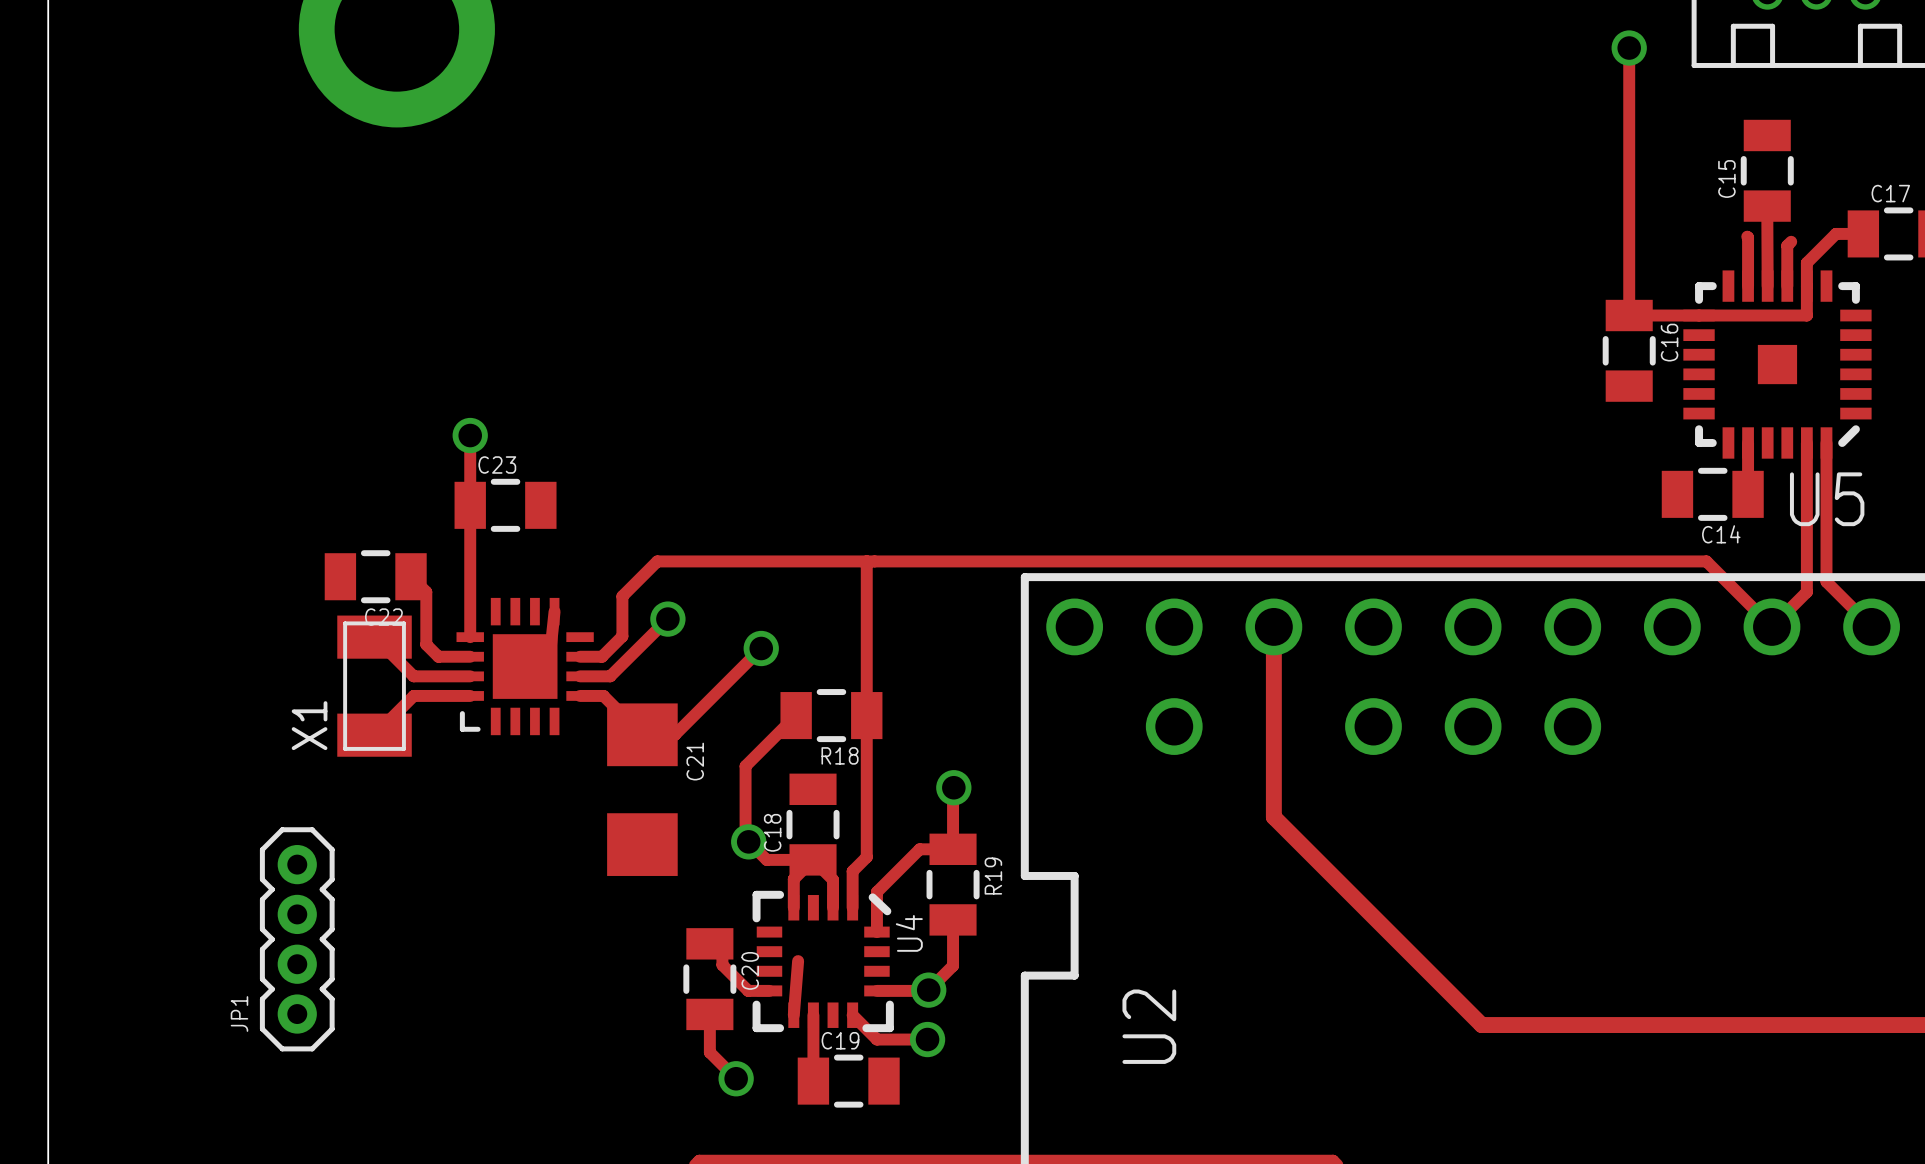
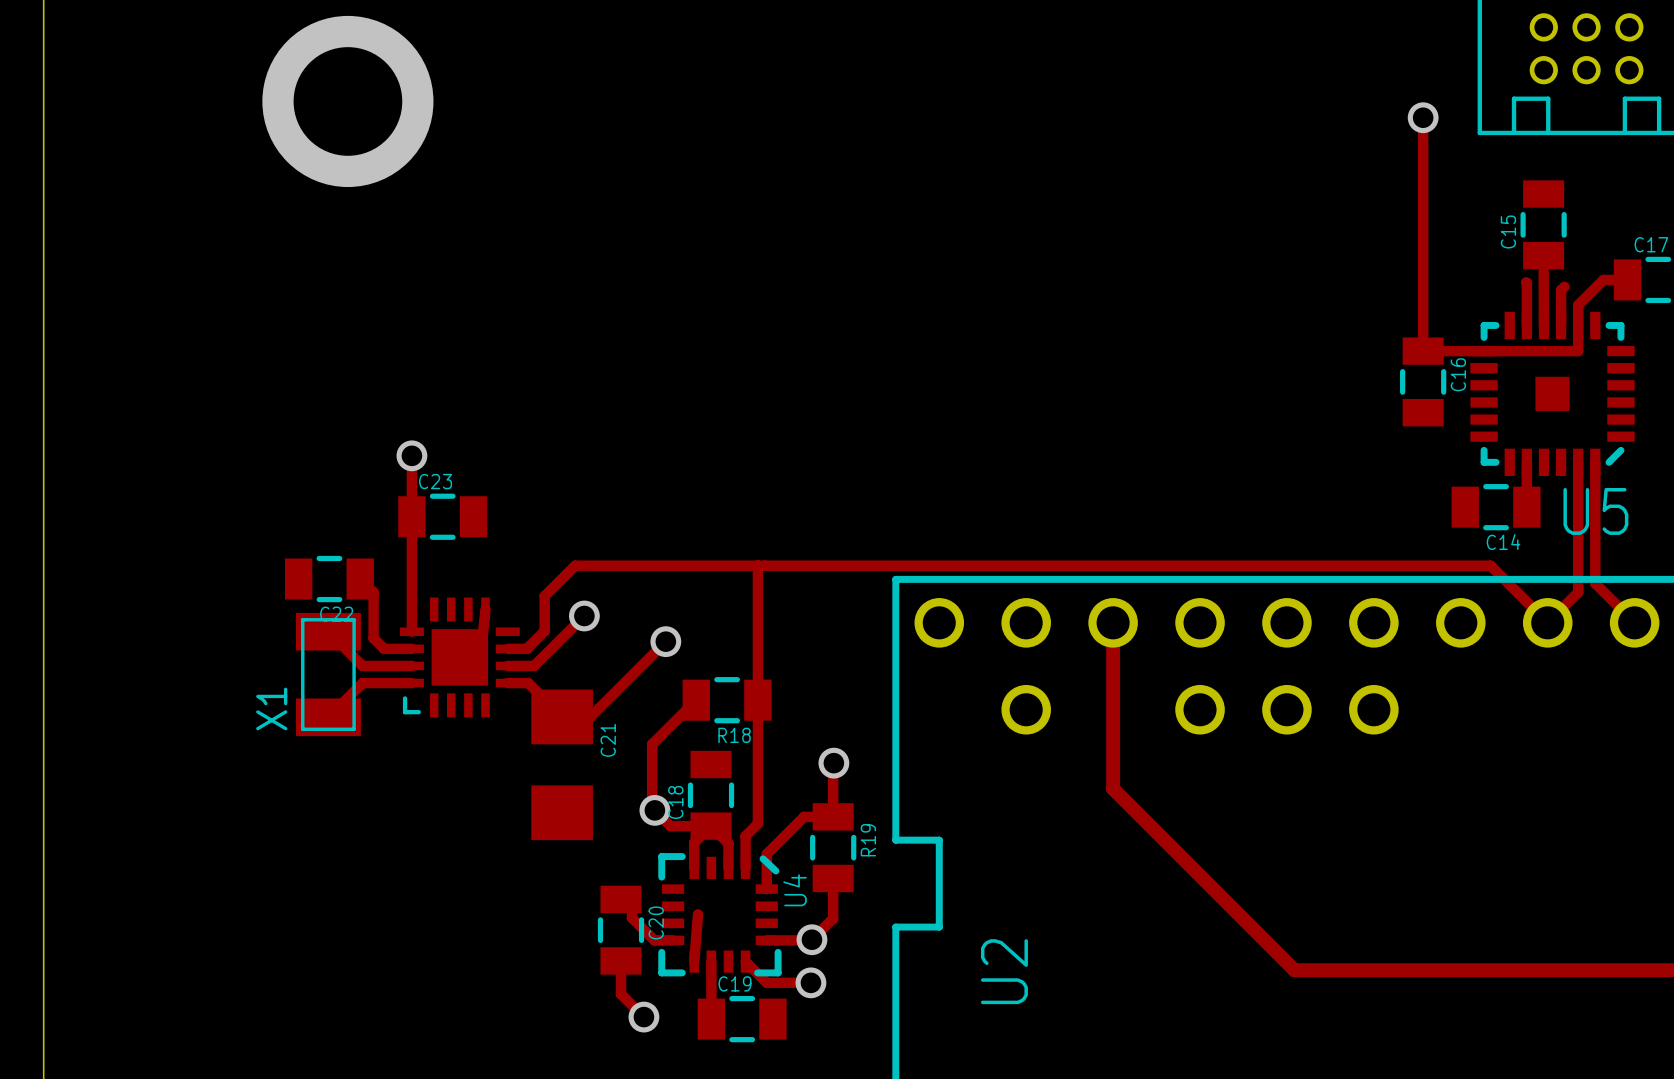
JP1: (297, 939) -> none

